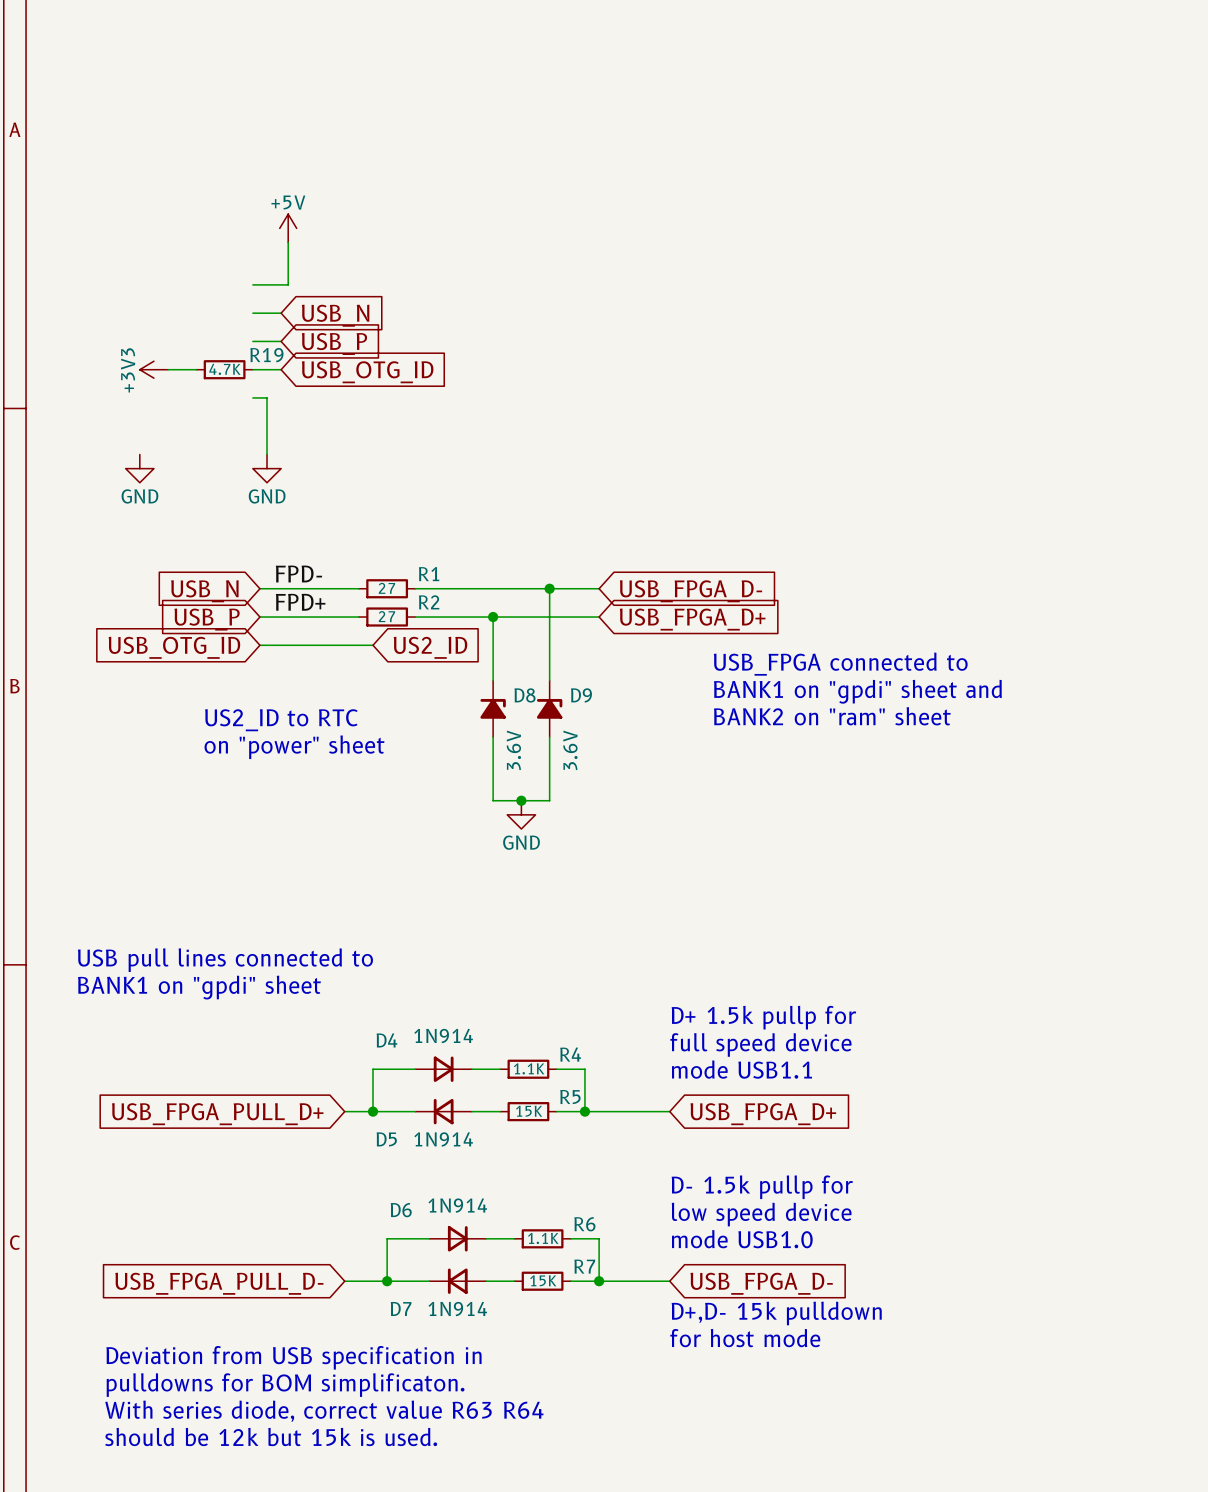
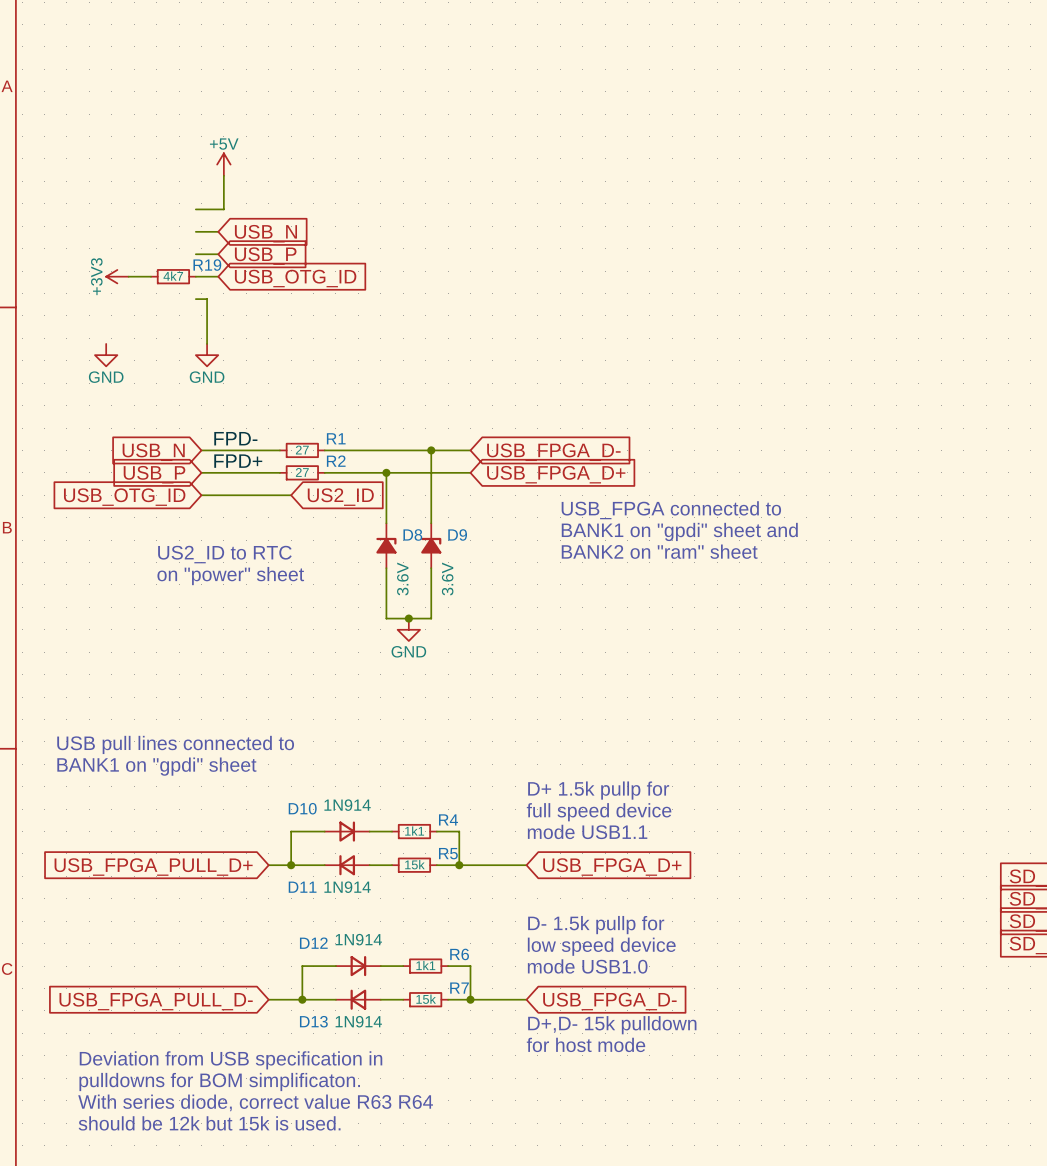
R19 value: 4.7K (224, 369) -> 4k7 (173, 276)
D4 name: D4 (386, 1040) -> D10 (302, 808)
R4 value: 1.1K (529, 1068) -> 1k1 (414, 831)
R5 value: 15K (529, 1111) -> 15k (414, 864)
D5 name: D5 (386, 1139) -> D11 (302, 887)
D6 name: D6 (401, 1210) -> D12 (313, 943)
R6 value: 1.1K (543, 1238) -> 1k1 (425, 965)
R7 value: 15K (543, 1280) -> 15k (426, 999)
D7 name: D7 (401, 1308) -> D13 (313, 1021)

